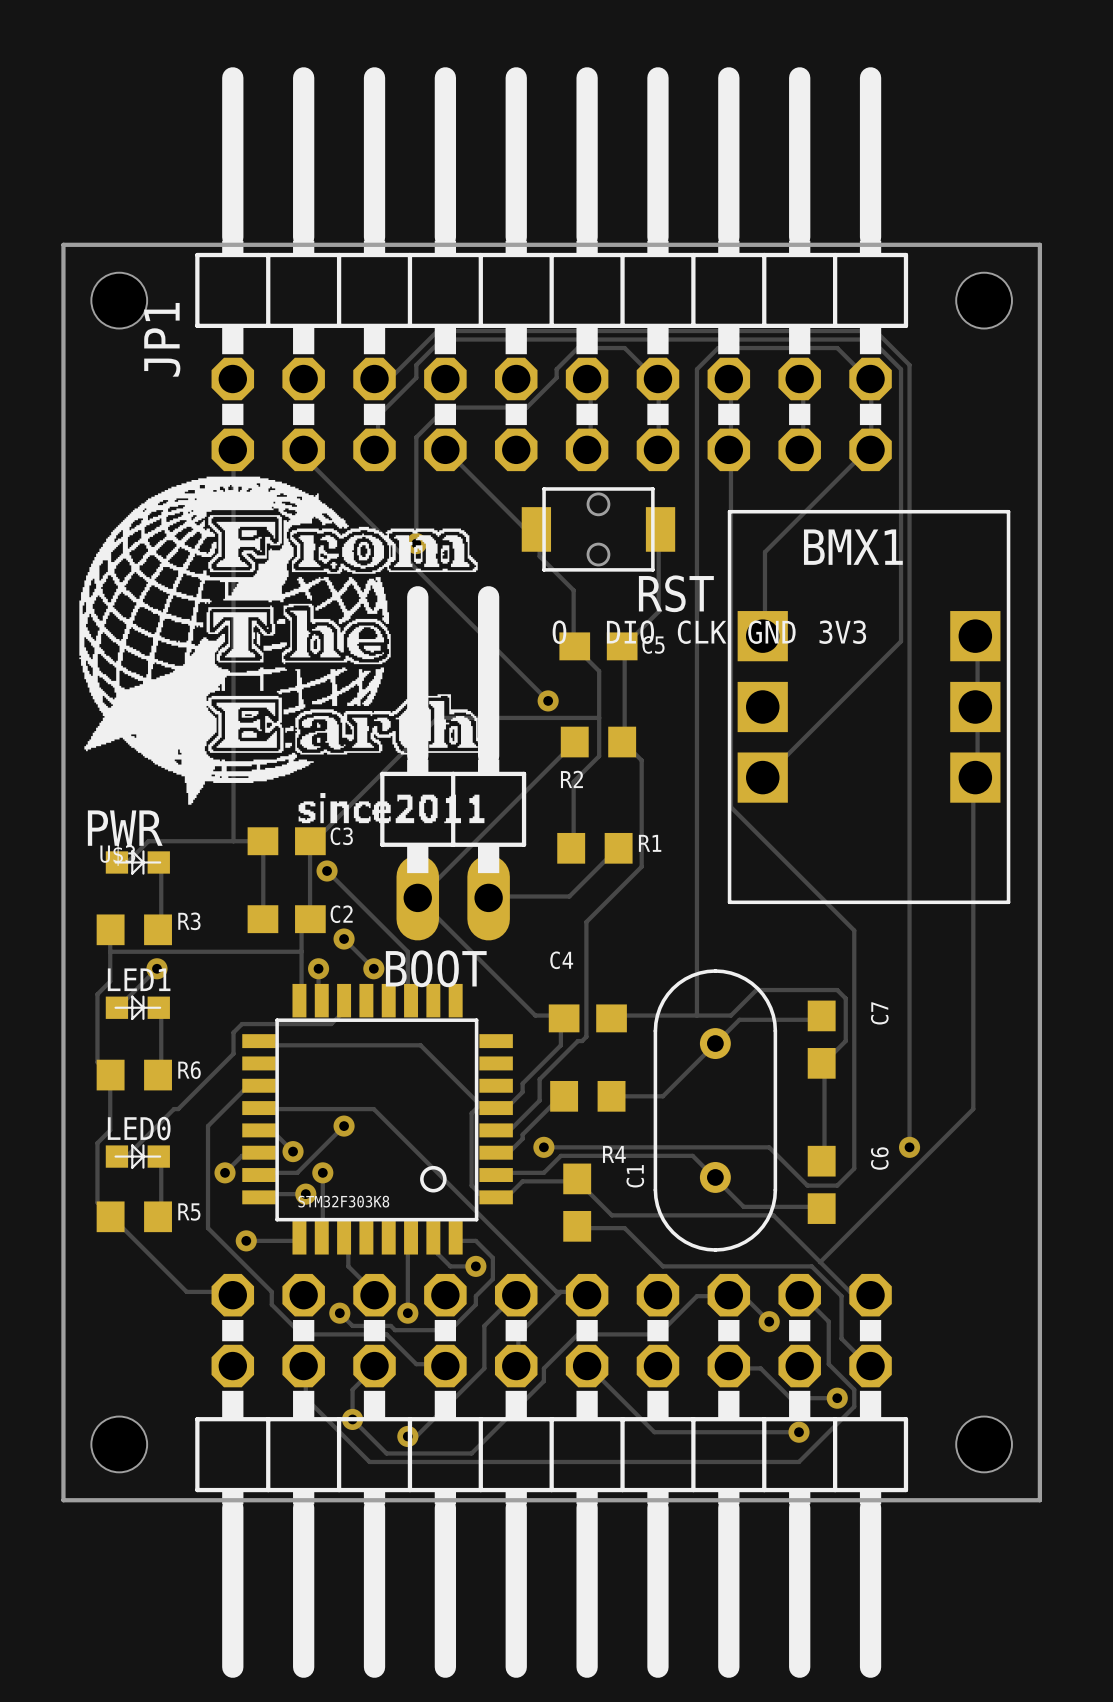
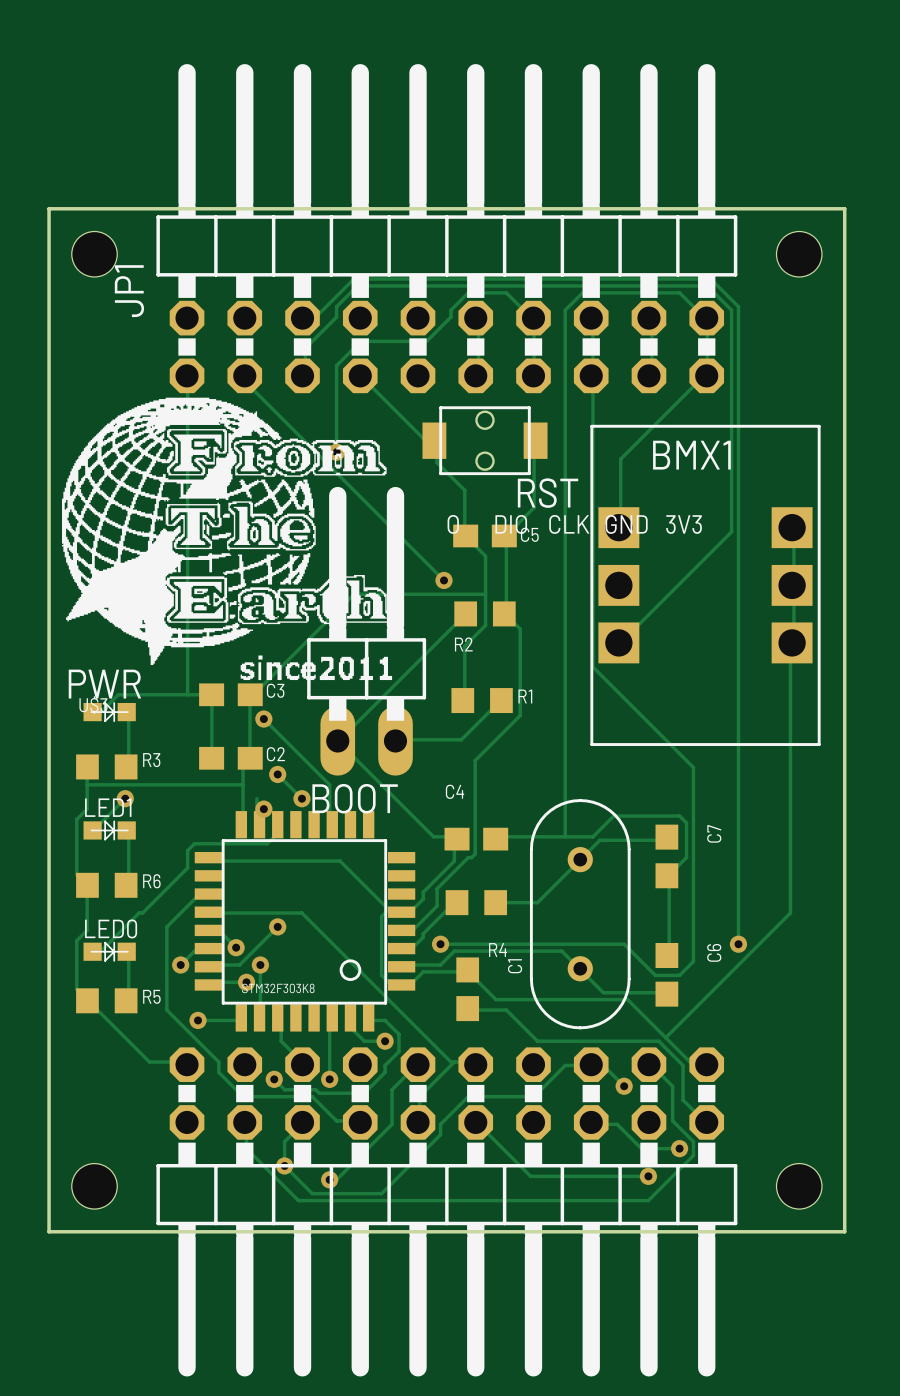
via position: (318, 968) -> (263, 809)

